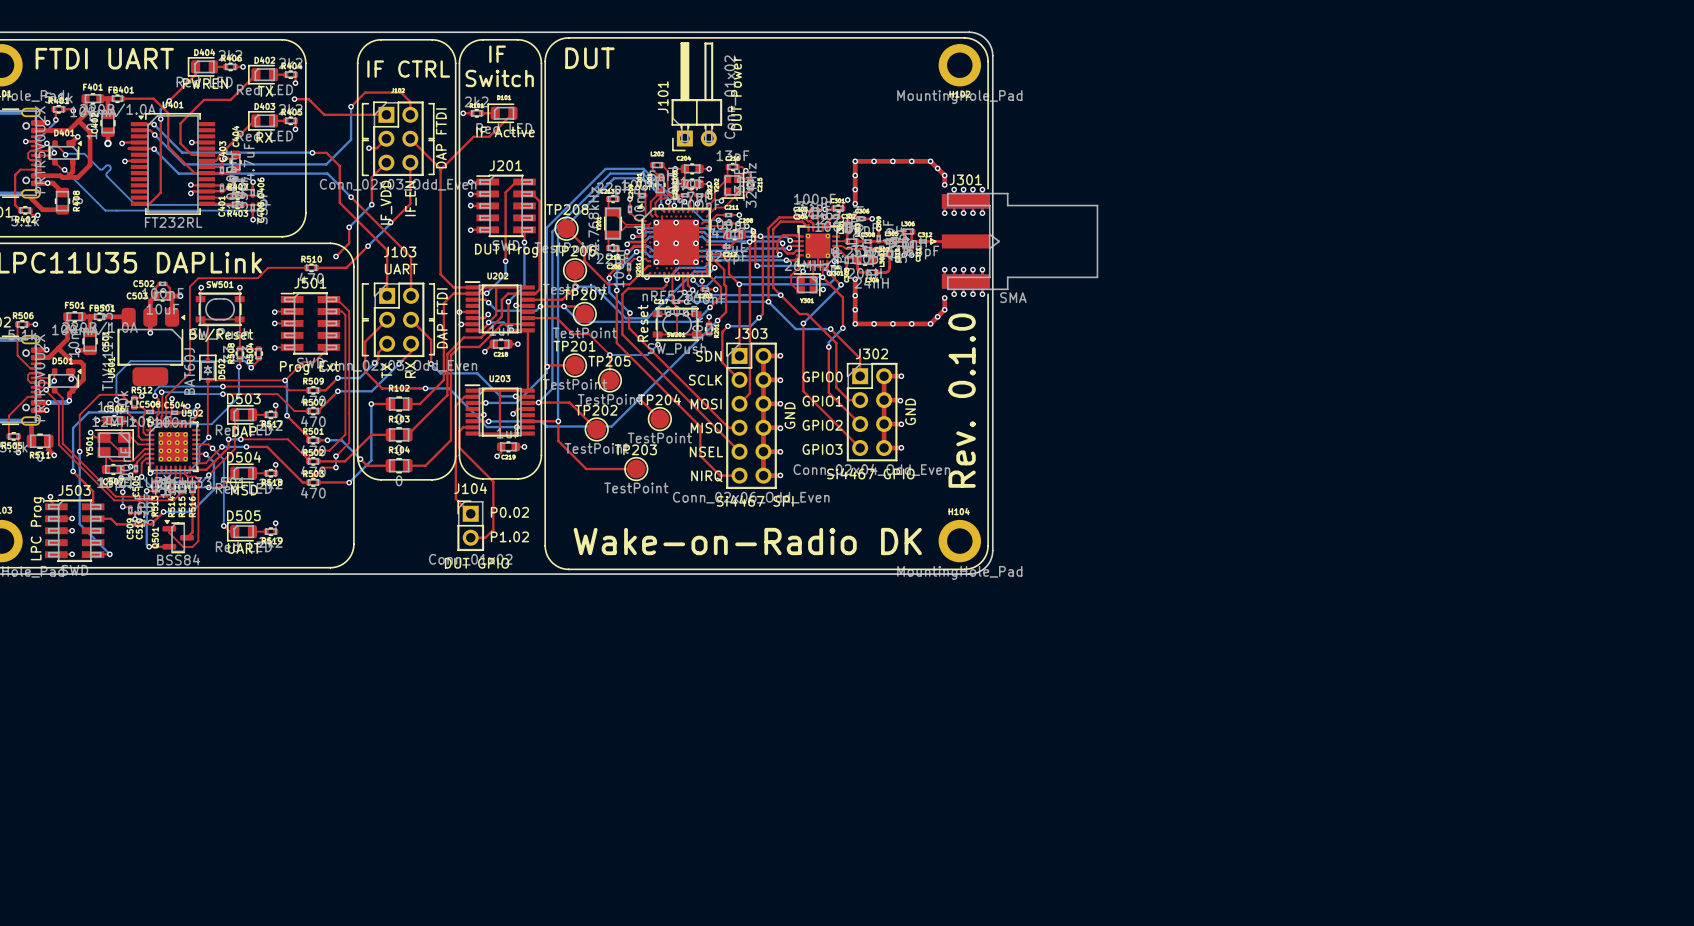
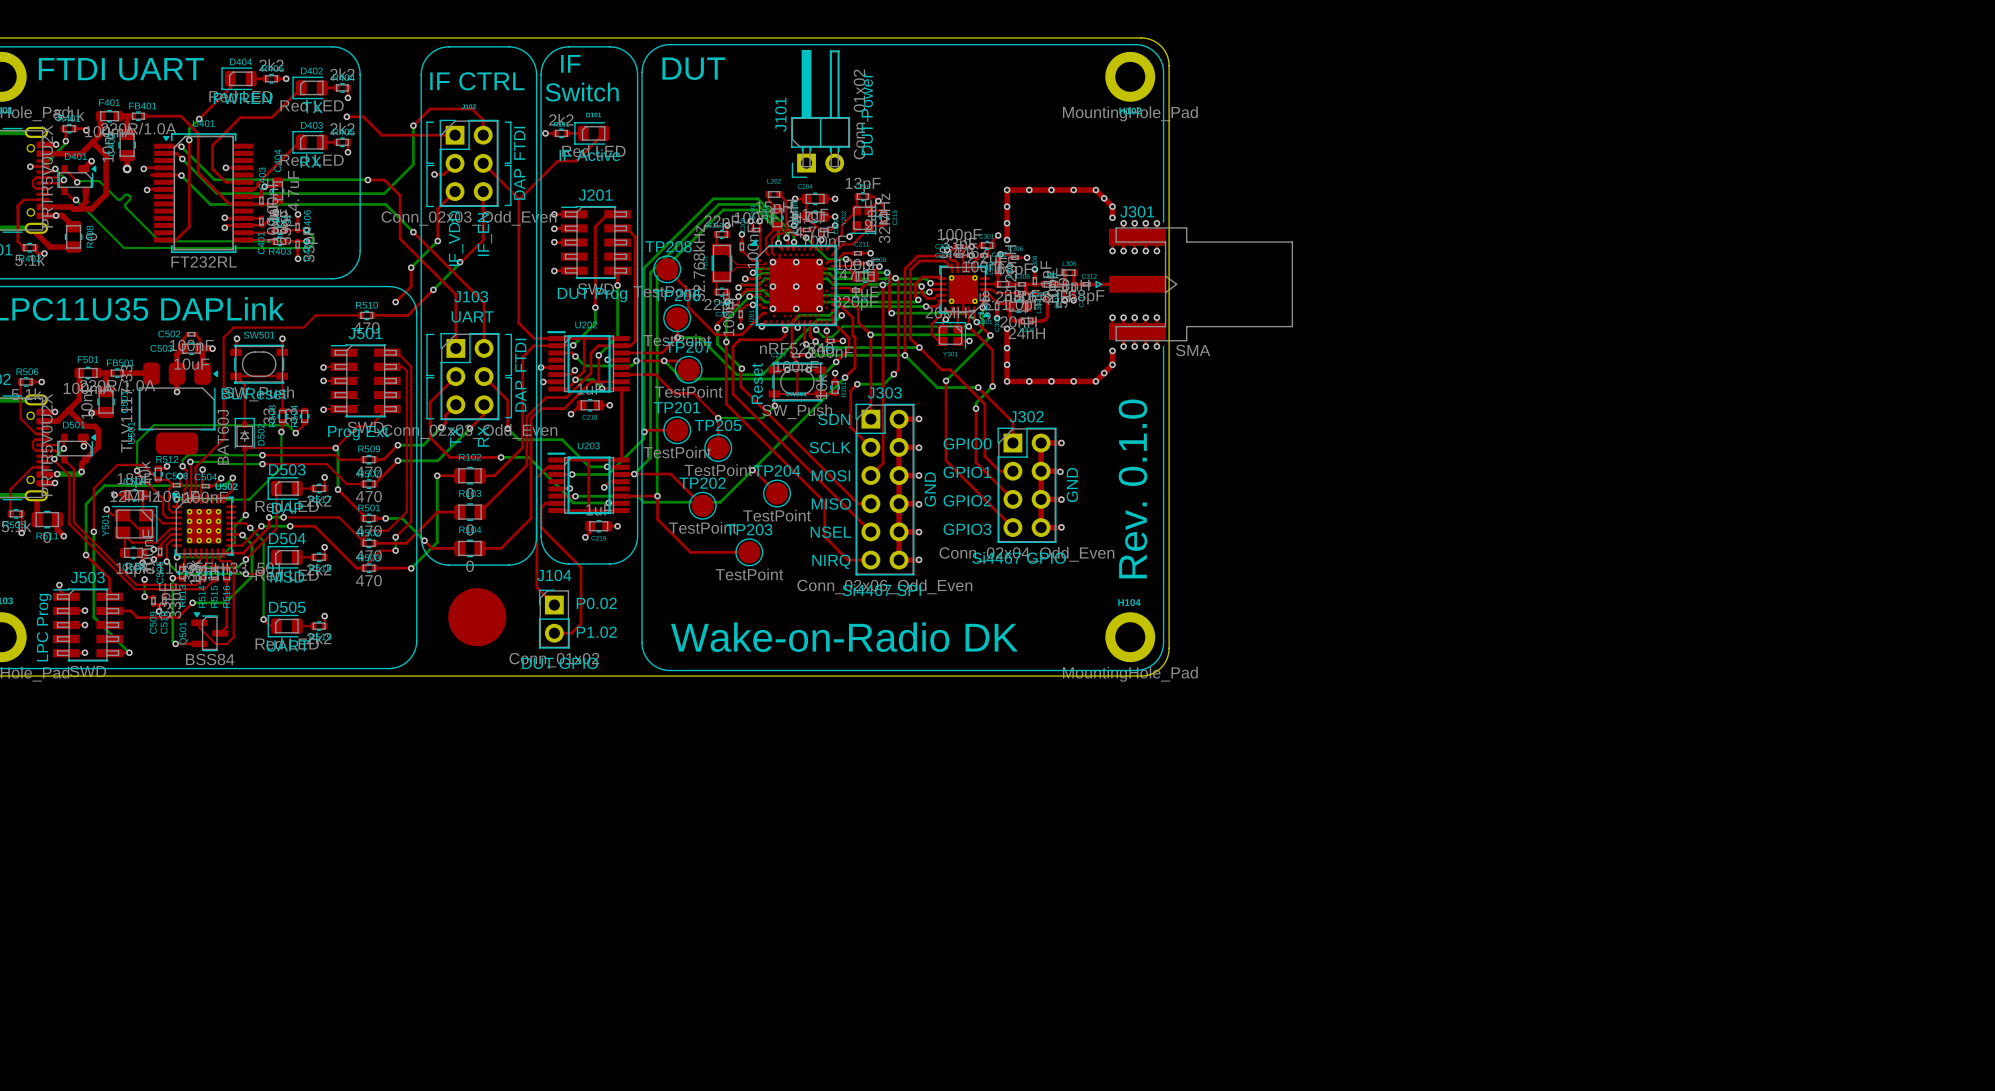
drawing: none -> [448, 588, 507, 647]

